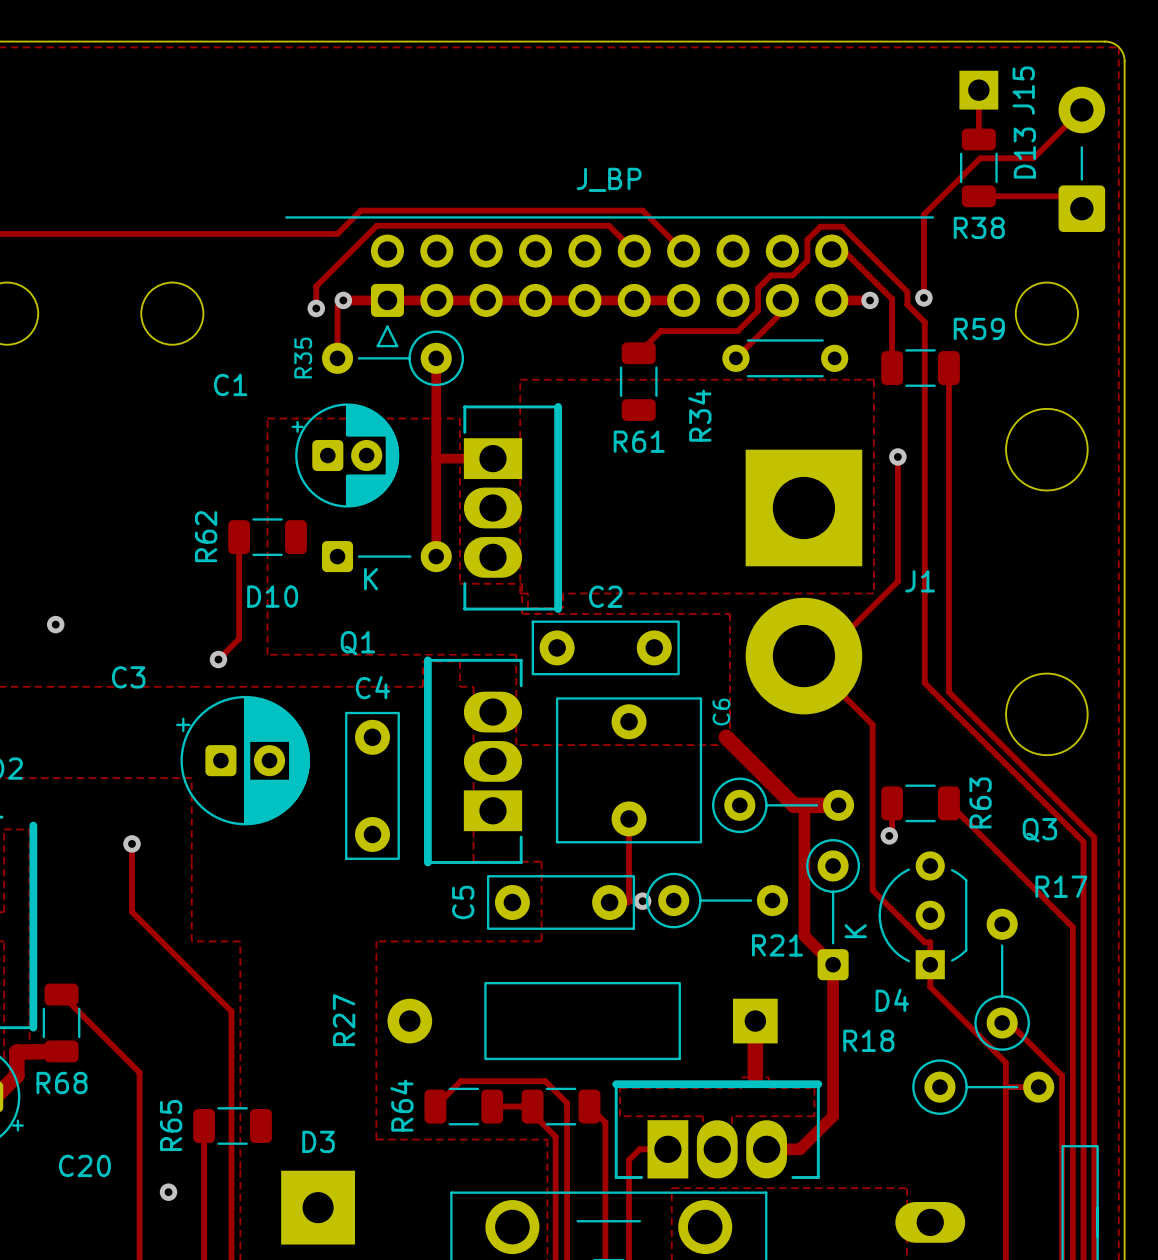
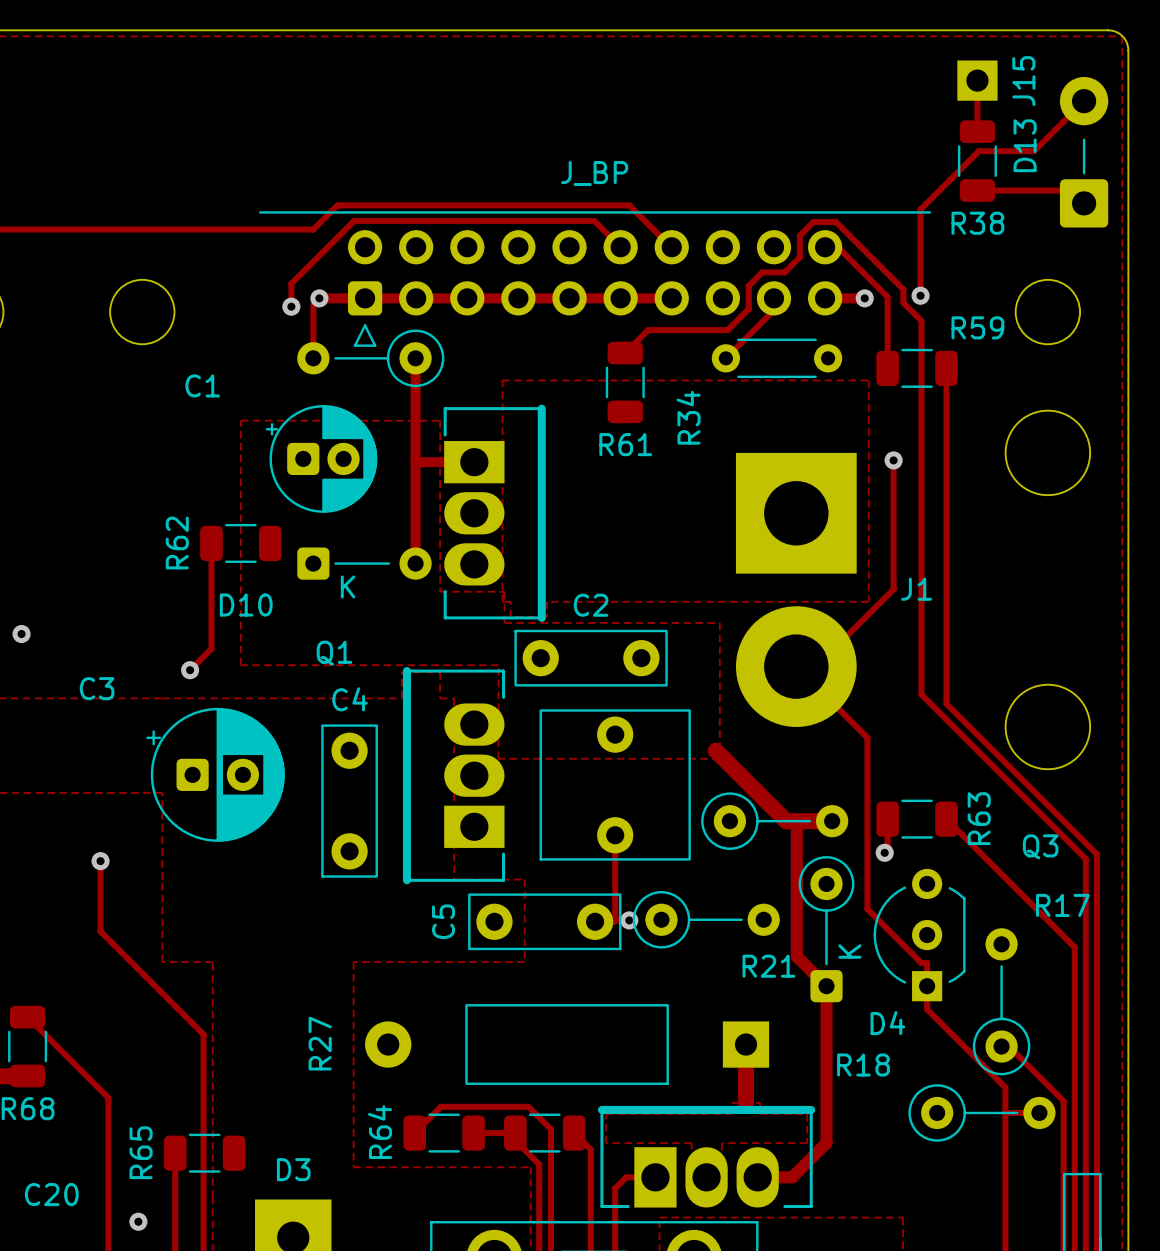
R35 name: R35 (303, 357) -> none
C6 name: C6 (721, 712) -> none

